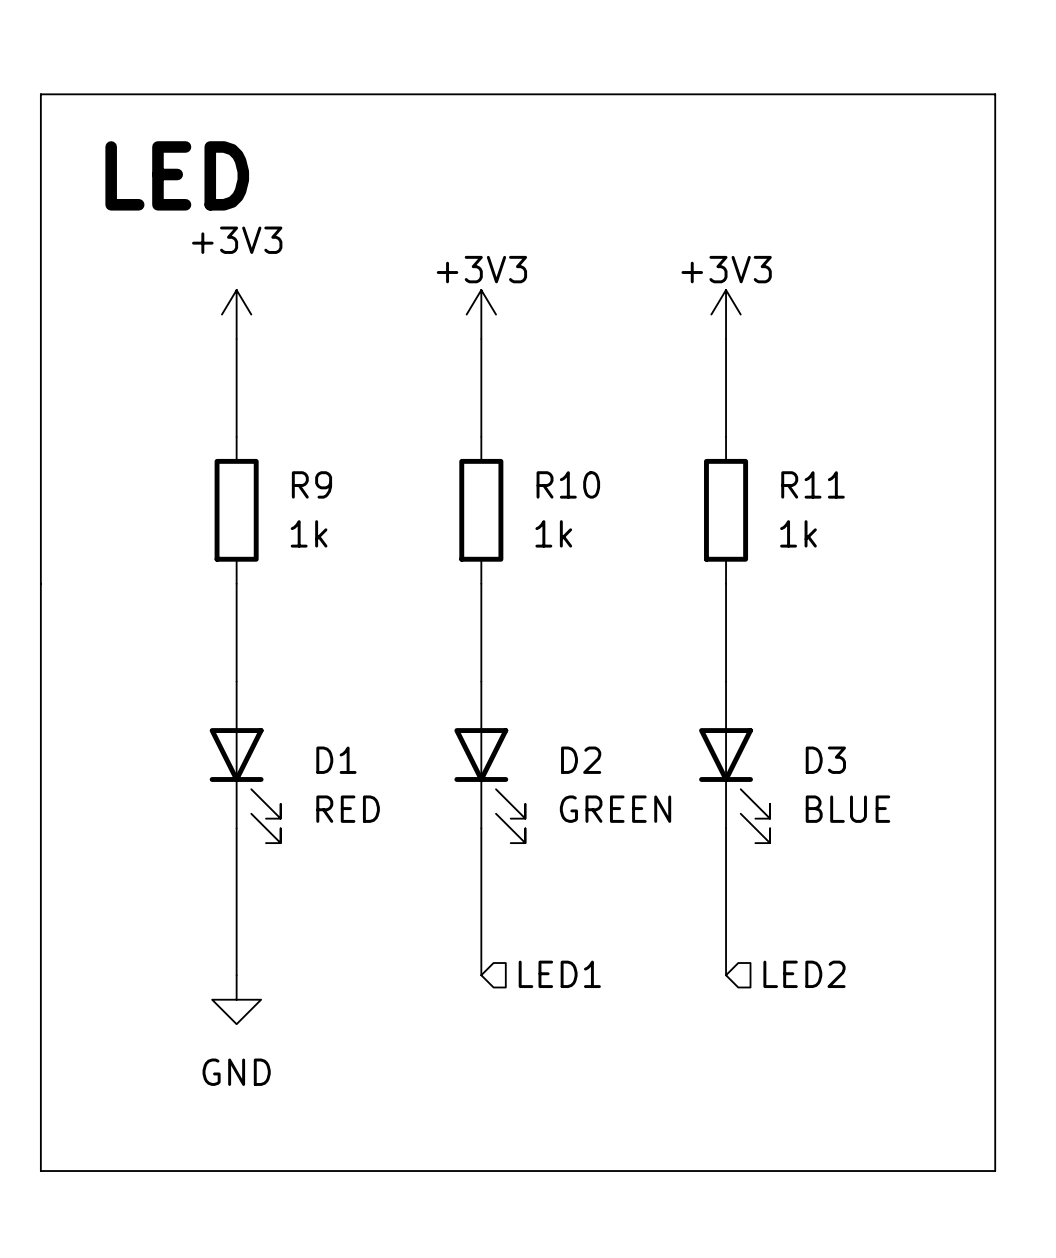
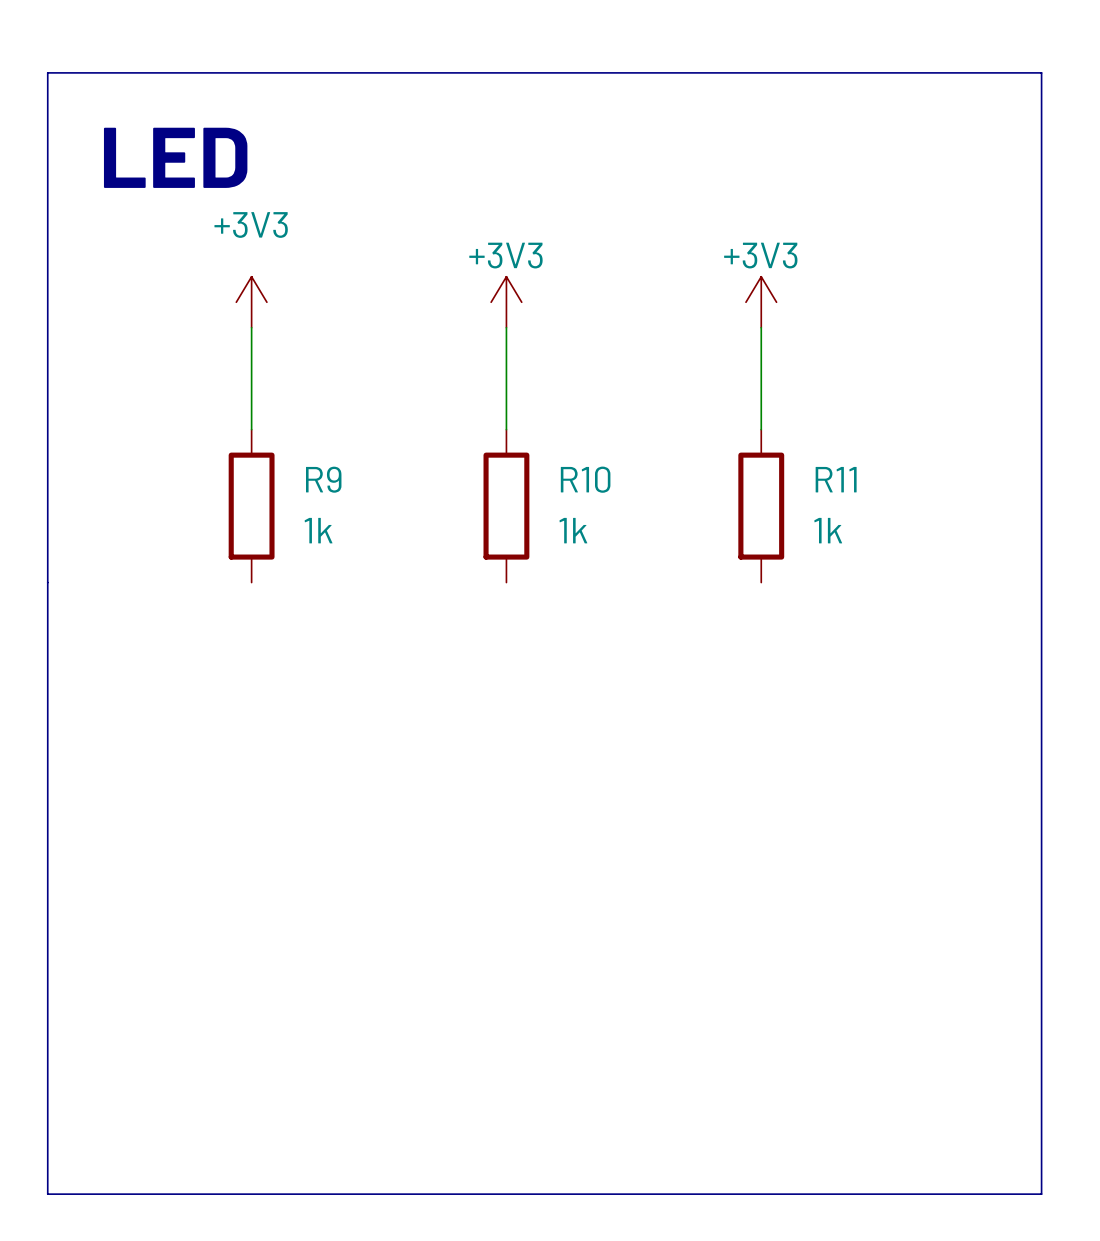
wire: (236, 583) (236, 681) -> none
wire: (481, 583) (481, 681) -> none
wire: (726, 583) (726, 681) -> none
D1: RED (245, 762) -> none
D2: GREEN (489, 762) -> none
D3: BLUE (734, 762) -> none
wire: (236, 828) (236, 975) -> none
wire: (481, 828) (481, 975) -> none
wire: (726, 828) (726, 975) -> none
hierarchical label: LED1 (559, 974) -> none
hierarchical label: LED2 (804, 974) -> none
power symbol: GND (236, 999) -> none

